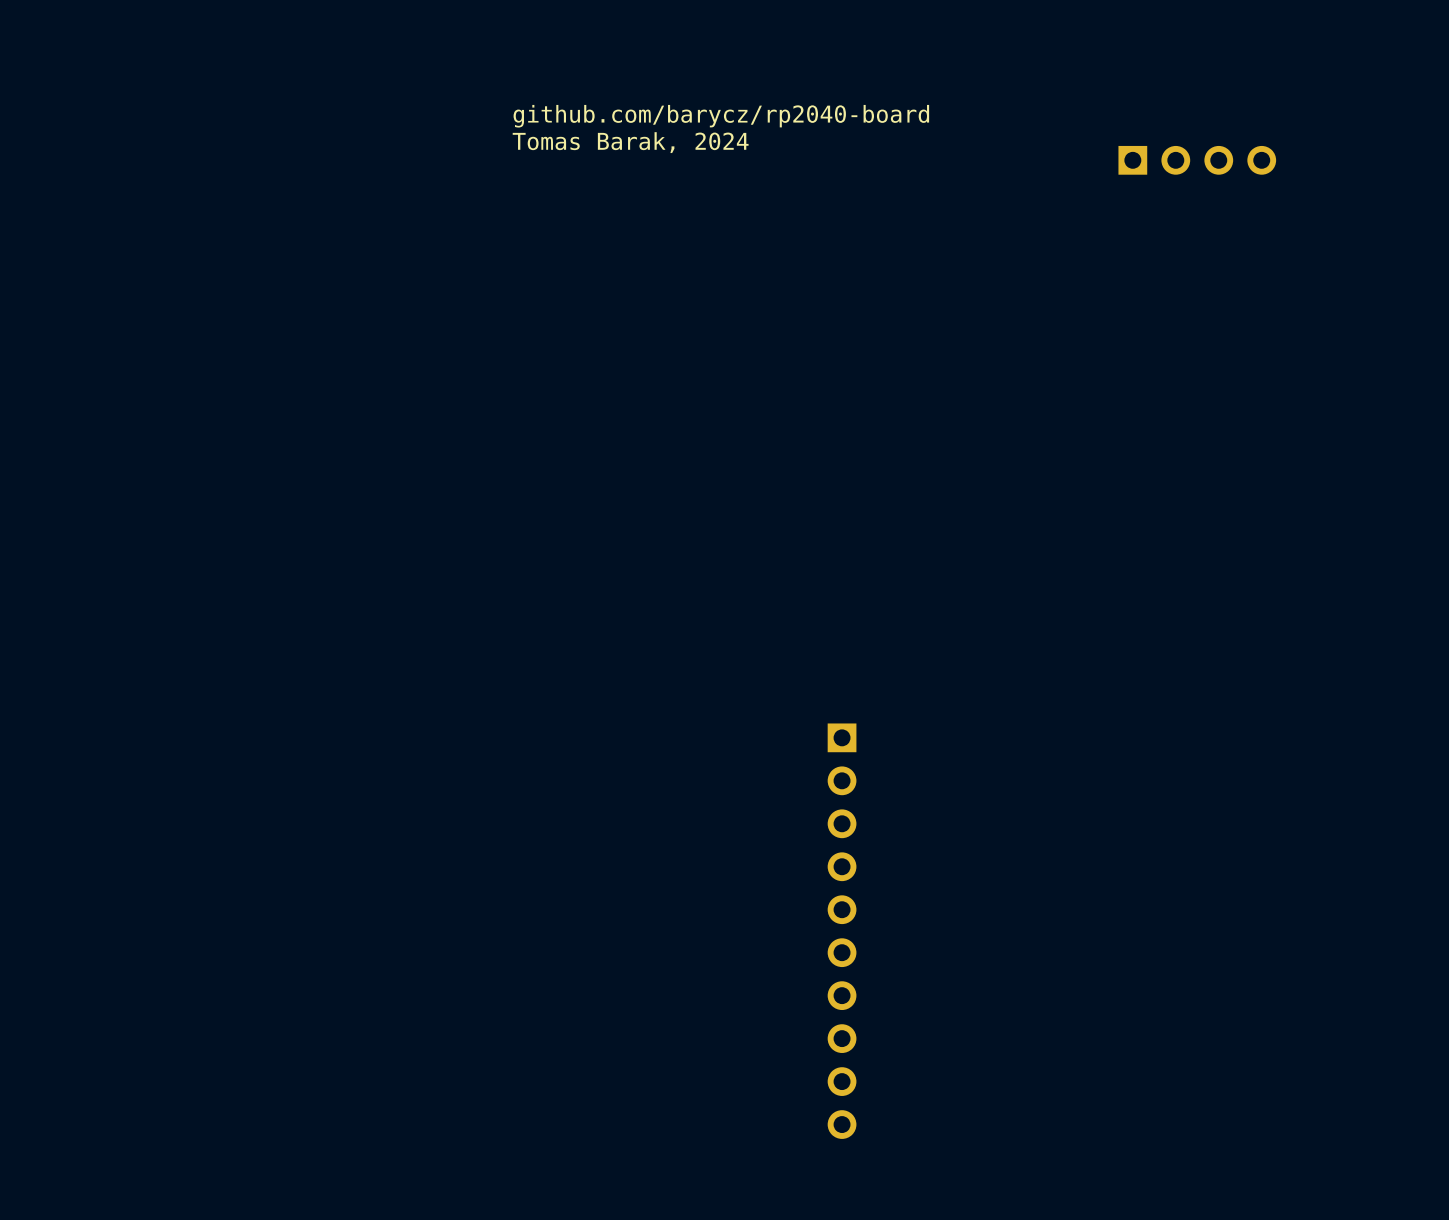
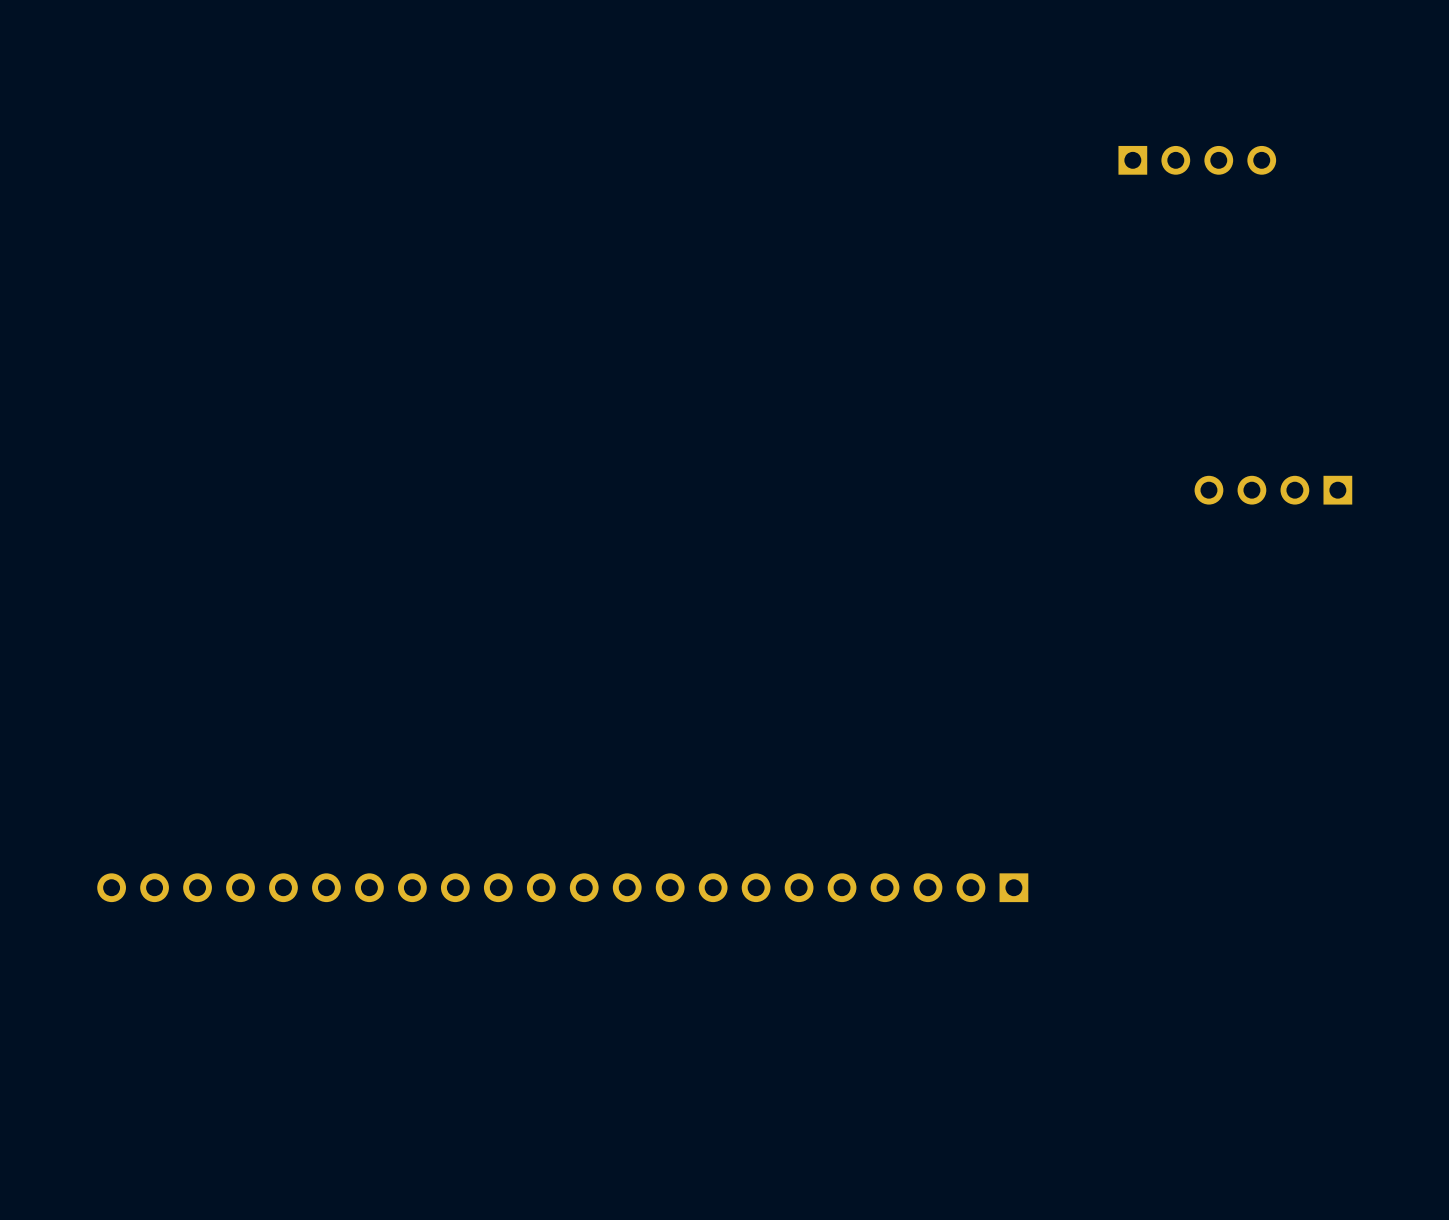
text: github.com/barycz/rp2040-board (721, 116) -> none
text: Tomas Barak, 2024 (630, 142) -> none
part: none -> (1273, 490)
part: none -> (562, 887)
part: (842, 931) -> none

